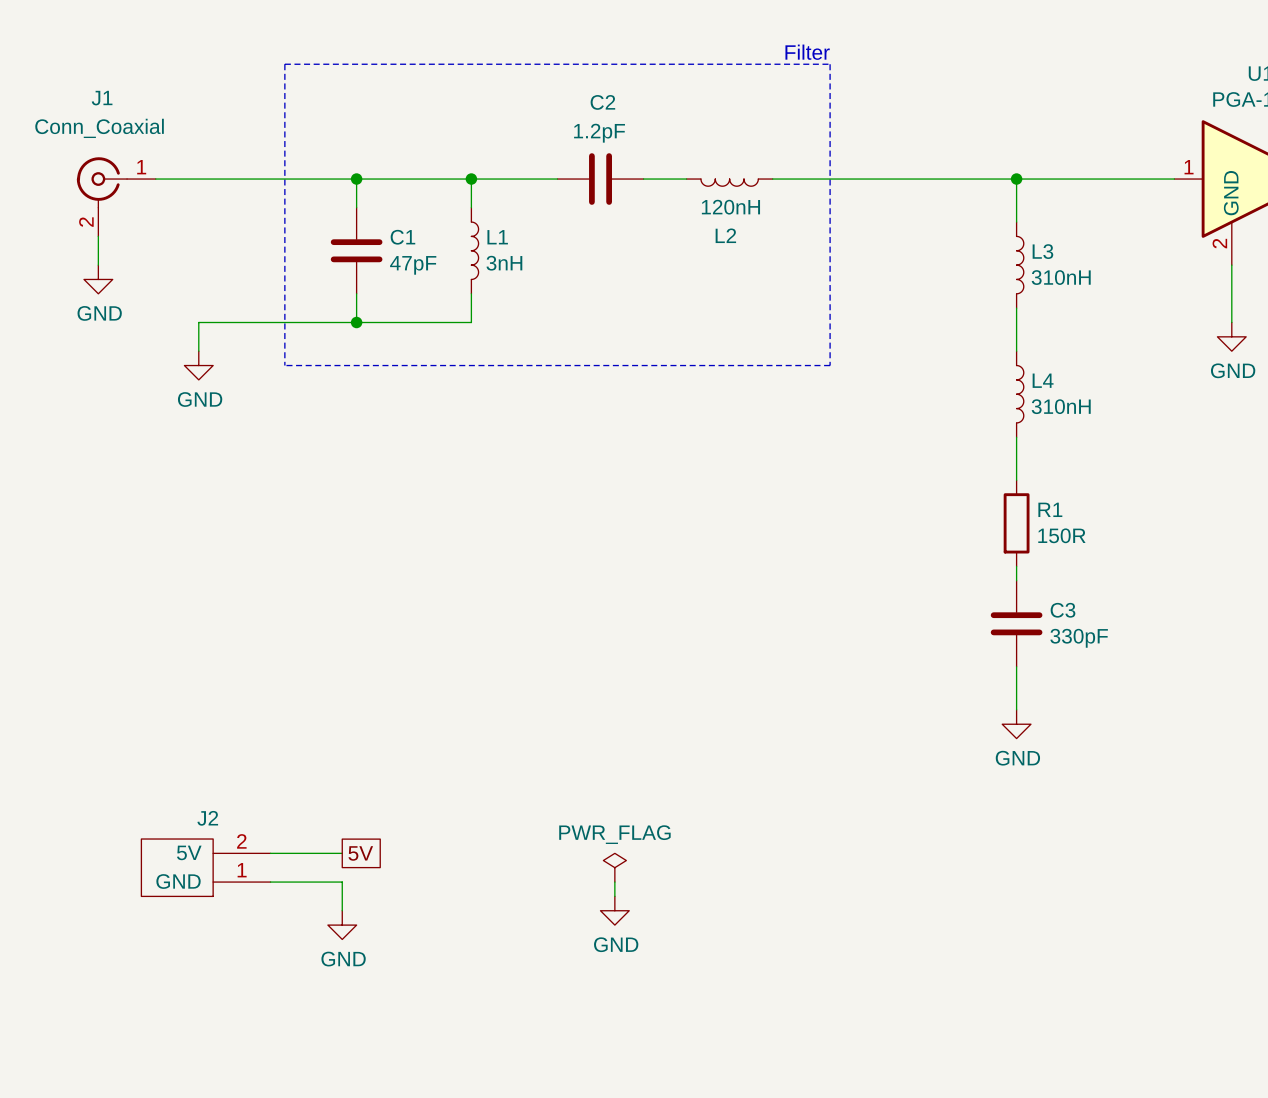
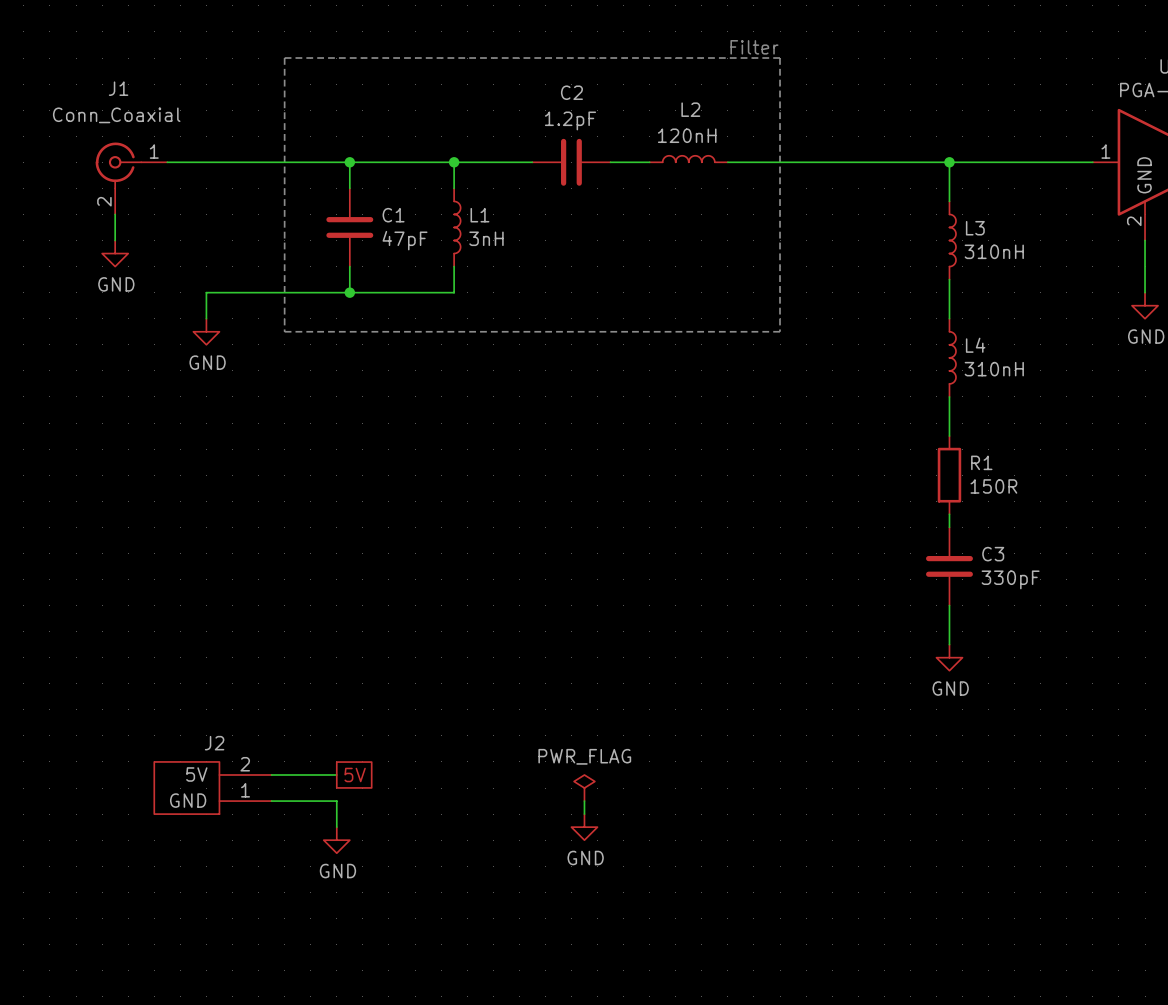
L2 rotation: 0° (729, 182) -> 180° (688, 159)

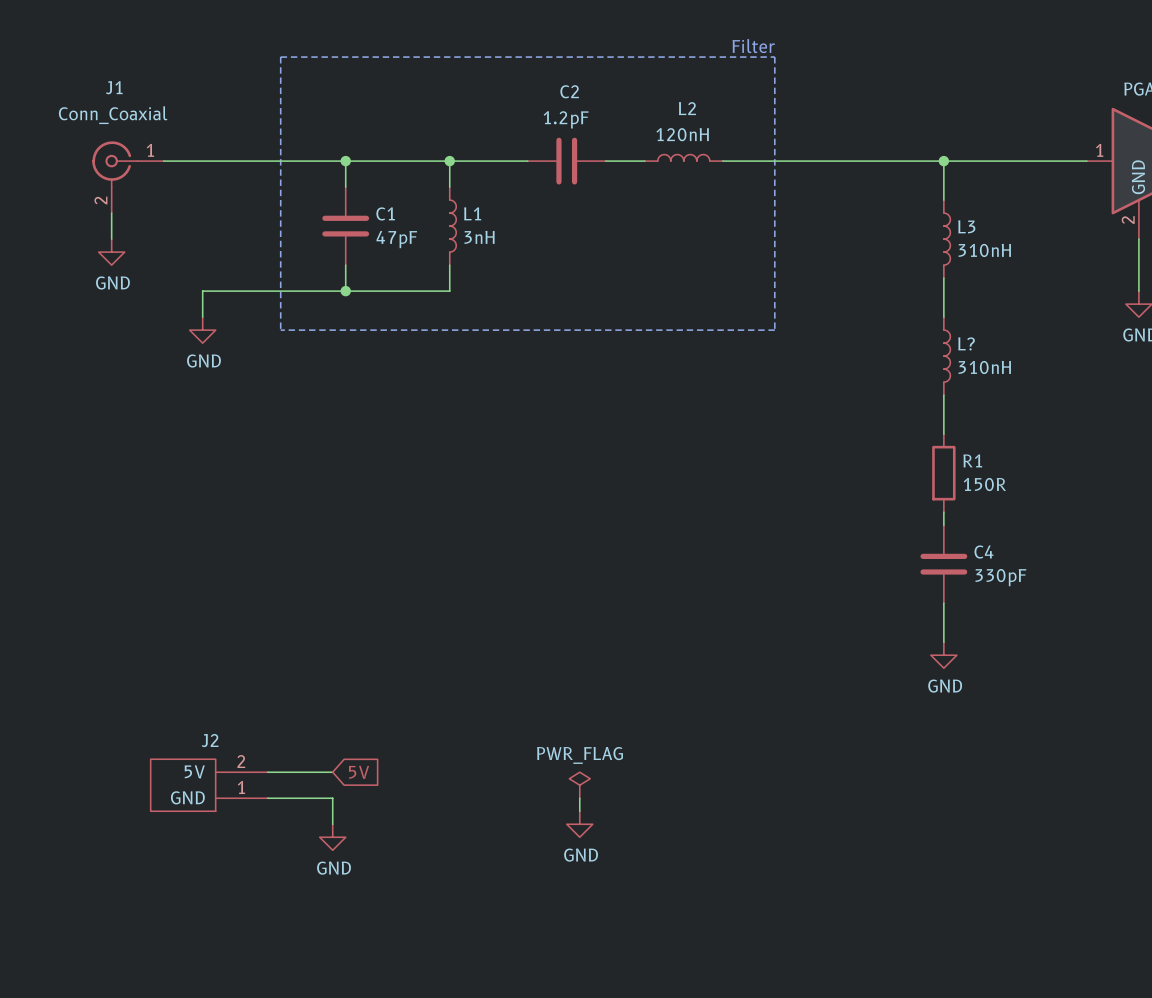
L4 name: L4 (975, 345) -> L? (966, 343)
C3 name: C3 (993, 554) -> C4 (983, 552)
global label shape: passive (355, 774) -> input (359, 772)

